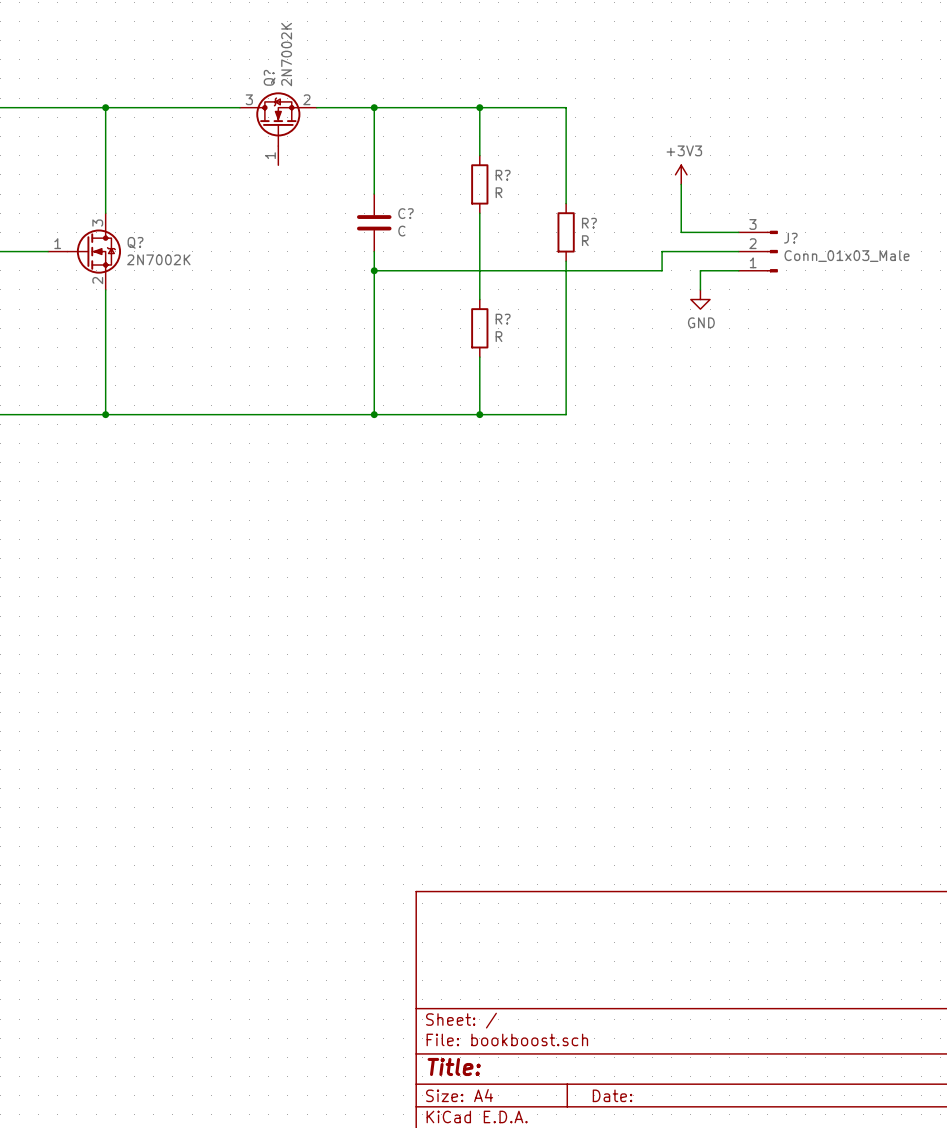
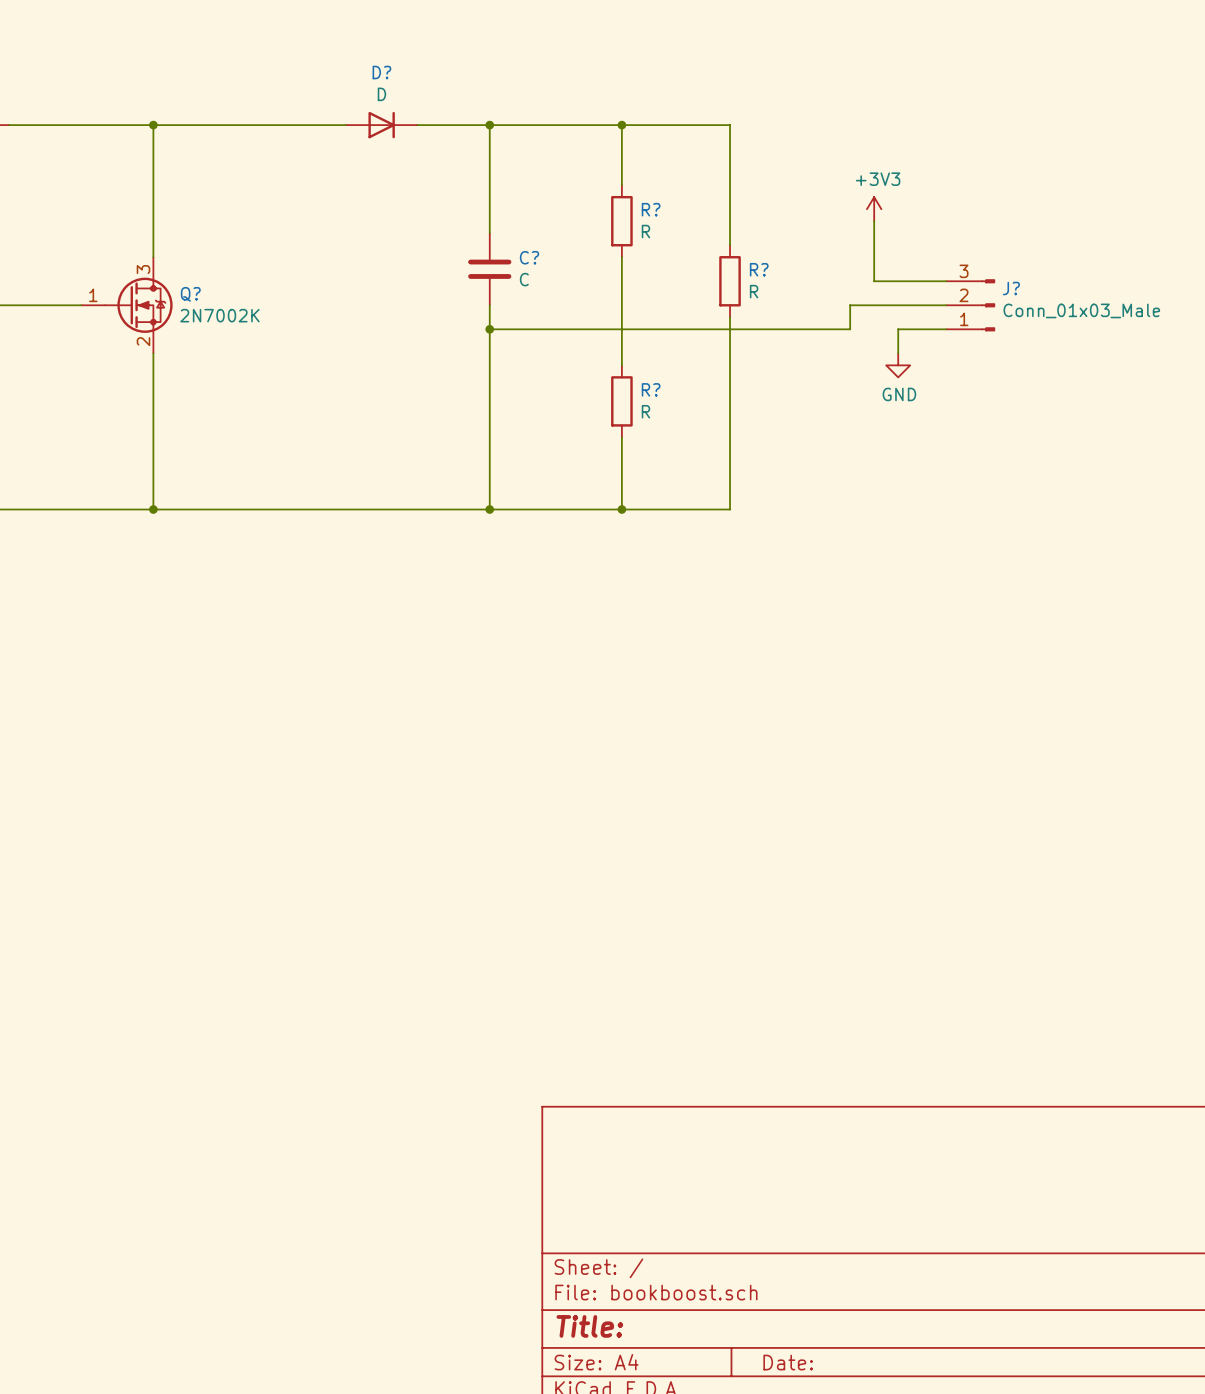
D?: none -> D (381, 125)
Q?: 2N7002K (278, 128) -> none

